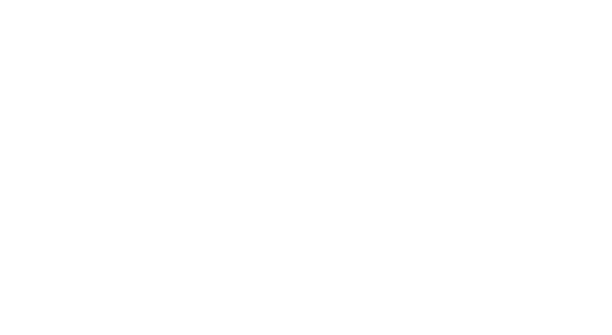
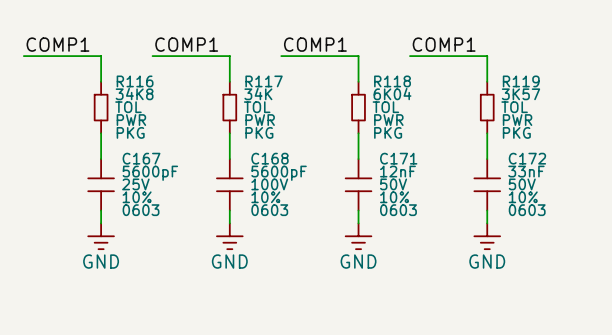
label: none -> COMP1 (57, 44)
label: none -> COMP1 (186, 44)
label: none -> COMP1 (315, 44)
label: none -> COMP1 (444, 44)
wire: none -> (23, 56) (101, 56) (101, 81)
wire: none -> (152, 56) (229, 56) (229, 81)
wire: none -> (281, 56) (358, 56) (358, 81)
wire: none -> (410, 56) (487, 56) (487, 81)
R116: none -> 34K8 (101, 107)
R117: none -> 34K (229, 107)
R118: none -> 6K04 (358, 107)
R119: none -> 3K57 (487, 107)
wire: none -> (101, 133) (101, 159)
wire: none -> (229, 133) (229, 159)
wire: none -> (358, 133) (358, 159)
wire: none -> (487, 133) (487, 159)
C167: none -> 5600pF (101, 184)
C168: none -> 5600pF (229, 184)
C171: none -> 12nF (358, 184)
C172: none -> 33nF (487, 184)
wire: none -> (101, 210) (101, 223)
wire: none -> (229, 210) (229, 223)
wire: none -> (358, 210) (358, 223)
wire: none -> (487, 210) (487, 223)
power symbol: none -> GND (101, 236)
power symbol: none -> GND (229, 236)
power symbol: none -> GND (358, 236)
power symbol: none -> GND (487, 236)

